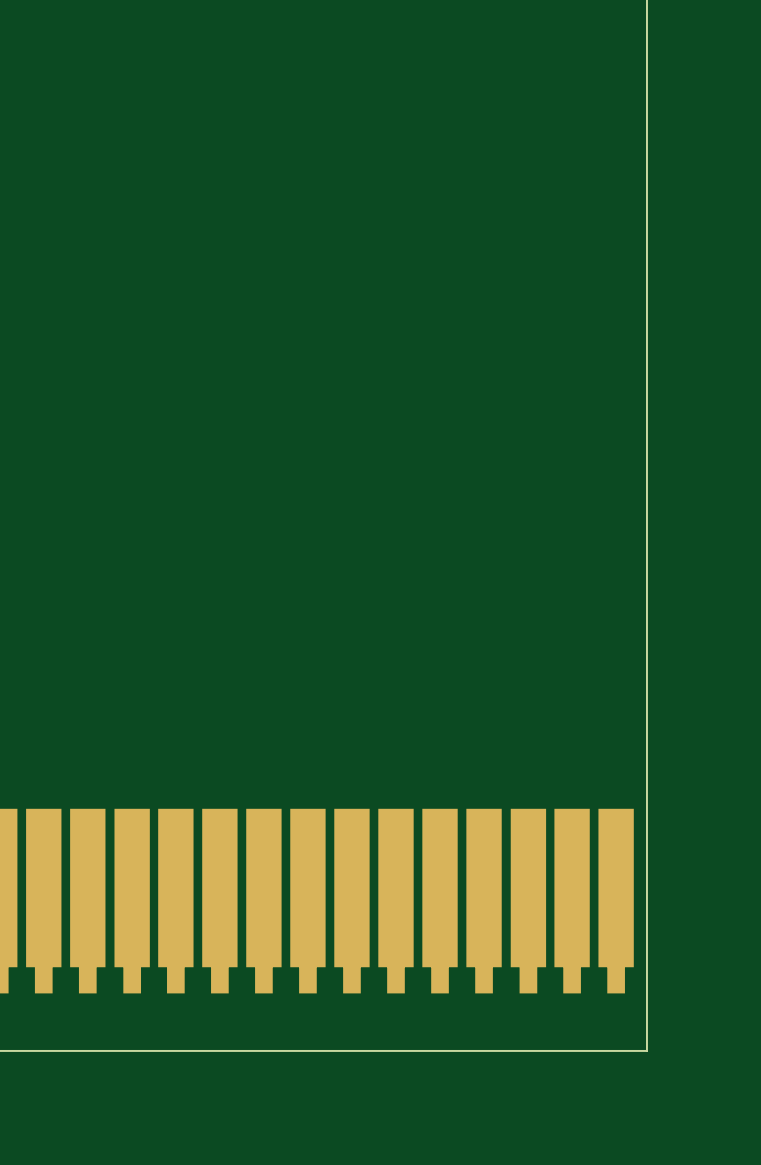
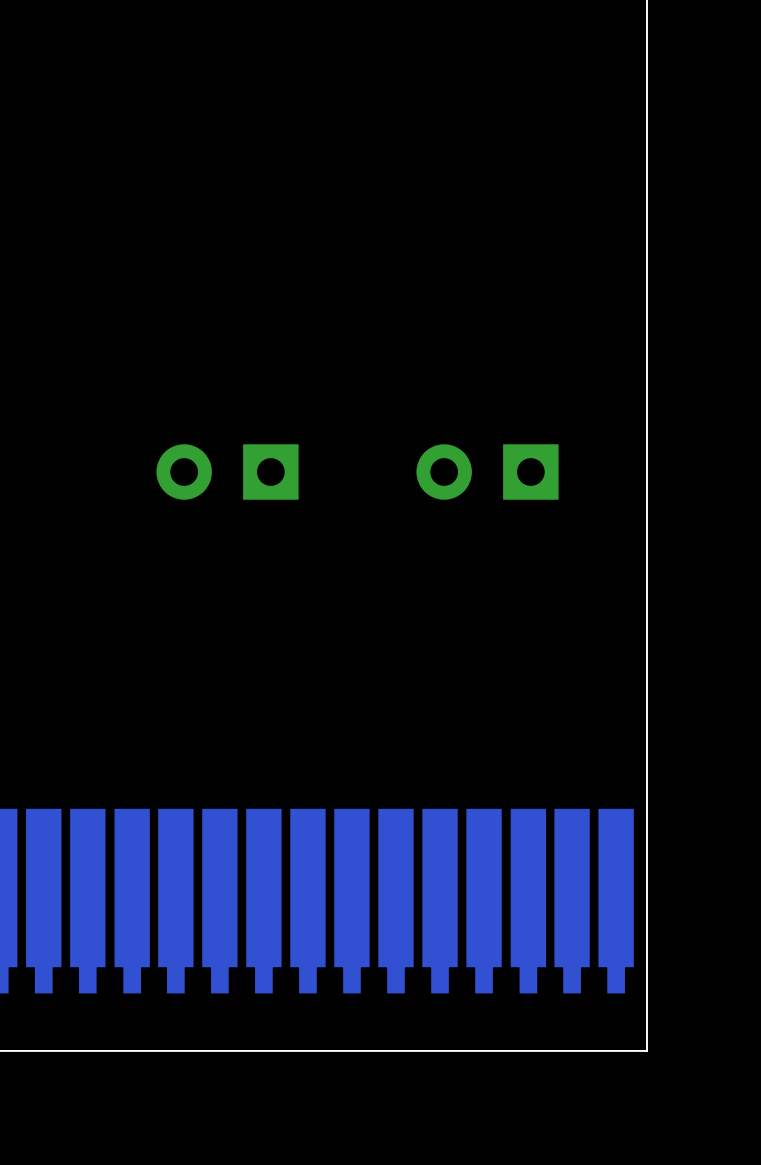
part: none -> (227, 472)
part: none -> (487, 472)

